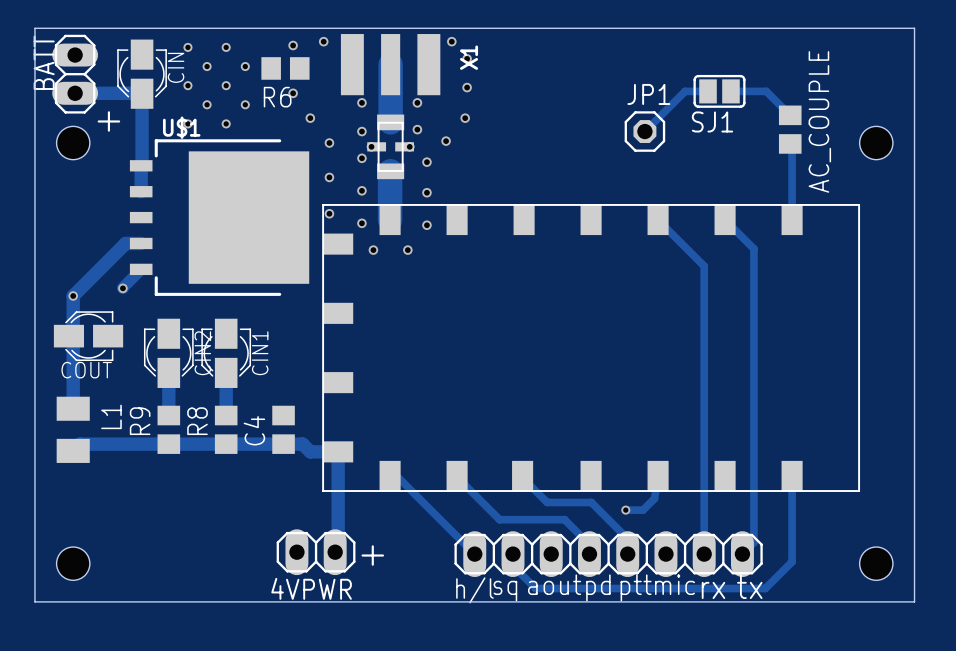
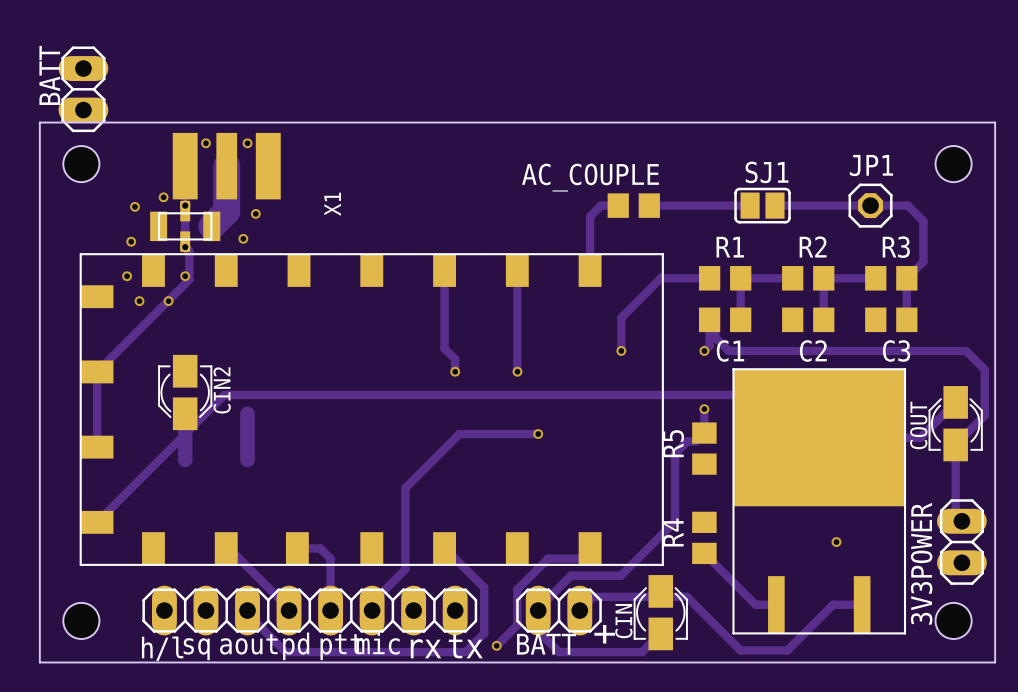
via: (323, 41) -> none
via: (451, 41) -> none
via: (293, 45) -> none
via: (187, 47) -> none
via: (226, 47) -> none
X1 name position: X1 (469, 57) -> X1 (332, 204)
via: (467, 58) -> none
track: (390, 64) (390, 122) -> none
X1 position: (390, 64) -> (226, 166)
via: (207, 66) -> none
via: (245, 66) -> none
R6: (285, 68) -> none
CIN: (142, 74) -> none
via: (187, 85) -> none
via: (226, 85) -> none
via: (467, 87) -> none
track: (708, 91) (685, 91) (644, 131) -> none
SJ1 position: (719, 91) -> (762, 205)
track: (730, 91) (766, 91) (790, 115) -> none
track: (75, 93) (142, 93) (141, 191) -> none
via: (293, 93) -> none
via: (361, 102) -> none
via: (417, 102) -> none
board edge: (34, 104) (34, 28) (914, 28) (914, 104) -> (39, 122) (995, 122)
via: (207, 104) -> none
via: (245, 104) -> none
via: (310, 118) -> none
via: (465, 118) -> none
text: + (108, 121) -> none
SJ1 name position: SJ1 (712, 121) -> SJ1 (767, 172)
AC_COUPLE name position: AC_COUPLE (819, 121) -> AC_COUPLE (590, 177)
via: (417, 129) -> none
AC_COUPLE rotation: 0° (790, 129) -> 90° clockwise (633, 205)
AC_COUPLE position: (790, 129) -> (633, 205)
via: (361, 131) -> none
JP1 position: (644, 131) -> (870, 205)
via: (446, 141) -> none
via: (329, 143) -> none
track: (790, 143) (792, 145) (792, 220) -> none
track: none -> (185, 166) (185, 247) (189, 251) (189, 279) (97, 371) (97, 447)
track: none -> (226, 166) (226, 211) (211, 226)
part rotation: 0° (390, 146) -> 90° clockwise (185, 226)
part position: (390, 146) -> (185, 226)
via: (361, 158) -> none
via: (426, 162) -> none
track: (390, 171) (390, 220) -> none
via: none -> (163, 197)
via: (329, 177) -> none
track: none -> (618, 205) (601, 205) (590, 216) (590, 270)
track: none -> (649, 205) (750, 205)
track: none -> (775, 205) (907, 205) (923, 221) (923, 261) (906, 278) (906, 319)
via: none -> (134, 206)
via: none -> (255, 213)
via: (361, 190) -> none
via: (426, 192) -> none
via: none -> (243, 238)
via: (329, 213) -> none
via: none -> (131, 241)
U$1: (219, 217) -> none
track: (658, 220) (704, 266) (704, 554) -> none
track: (725, 220) (753, 248) (753, 542) (742, 554) -> none
via: (361, 223) -> none
via: (426, 225) -> none
track: none -> (444, 270) (444, 348) (455, 359) (455, 371)
track: none -> (517, 270) (517, 371)
track: (141, 243) (125, 243) (73, 295) (73, 331) (68, 336) (73, 340) (73, 408) -> none
via: none -> (127, 276)
via: none -> (185, 276)
track: none -> (709, 278) (661, 277) (621, 317) (621, 350)
R1: none -> (725, 278)
track: none -> (792, 278) (740, 278) (740, 319)
R2: none -> (808, 278)
track: none -> (875, 278) (823, 278) (823, 319)
R3: none -> (891, 278)
via: (373, 250) -> none
via: (407, 250) -> none
via: none -> (139, 301)
track: (141, 269) (122, 288) -> none
via: none -> (168, 301)
C1: none -> (725, 319)
C2: none -> (808, 319)
C3: none -> (891, 319)
via: (122, 288) -> none
via: (73, 295) -> none
via: none -> (621, 350)
track: none -> (704, 350) (709, 345) (709, 319) (715, 325) (715, 337) (728, 350) (966, 350) (984, 369) (984, 415) (955, 444) (955, 515) (961, 521)
via: none -> (704, 350)
via: none -> (455, 371)
via: none -> (517, 371)
COUT: (88, 336) -> none
part position: (591, 347) -> (371, 409)
CIN1: (226, 353) -> none
track: none -> (955, 402) (920, 437) (791, 437) (748, 395) (224, 395) (97, 522)
track: none -> (704, 409) (704, 433) (696, 441) (687, 441) (675, 453) (675, 521) (620, 575) (571, 575) (538, 608) (538, 631) (559, 652) (642, 652) (660, 633)
via: none -> (704, 409)
COUT: none -> (955, 423)
track: none -> (538, 434) (459, 434) (405, 488) (405, 569) (372, 602) (372, 610)
via: none -> (538, 434)
R5: none -> (704, 448)
L1: (73, 429) -> none
R9: (168, 429) -> none
R8: (226, 429) -> none
C4: (283, 429) -> none
track: (73, 450) (80, 444) (302, 444) (310, 451) (338, 451) (338, 549) (335, 552) -> none
part: none -> (819, 501)
track: (390, 475) (396, 475) (474, 554) -> none
track: (457, 475) (499, 519) (564, 519) (589, 544) (589, 554) -> none
track: (522, 475) (547, 502) (591, 502) (627, 538) (627, 554) -> none
track: (658, 475) (654, 498) (643, 510) (625, 510) -> none
track: (792, 475) (792, 561) (765, 588) (535, 588) (518, 571) -> none
R4: none -> (704, 537)
via: none -> (836, 542)
3V3POWER: none -> (961, 542)
track: none -> (226, 548) (229, 548) (289, 610)
track: none -> (297, 548) (320, 548) (330, 558) (330, 610)
track: none -> (444, 548) (484, 587) (484, 633) (465, 652) (285, 652) (247, 613) (247, 610)
track: none -> (590, 548) (579, 558) (548, 558) (517, 589) (517, 625) (496, 645)
track: none -> (704, 553) (755, 604) (776, 604)
via: (625, 510) -> none
track: none -> (862, 604) (833, 604) (787, 650) (740, 650) (686, 596) (593, 596) (579, 610)
4VPWR: (316, 552) -> none
BATT: none -> (559, 610)
part position: (608, 554) -> (309, 610)
text position: + (372, 555) -> + (604, 634)
CIN: none -> (660, 612)
text position: aout (554, 584) -> aout (248, 644)
text position: mic (675, 584) -> mic (378, 643)
via: none -> (496, 645)
text position: tx (749, 586) -> tx (465, 646)
text position: pd (598, 587) -> pd (296, 646)
text position: ptt (636, 587) -> ptt (341, 647)
text position: h/l (474, 590) -> h/l (162, 648)
text position: rx (713, 590) -> rx (426, 648)
text position: sq (505, 591) -> sq (196, 649)

